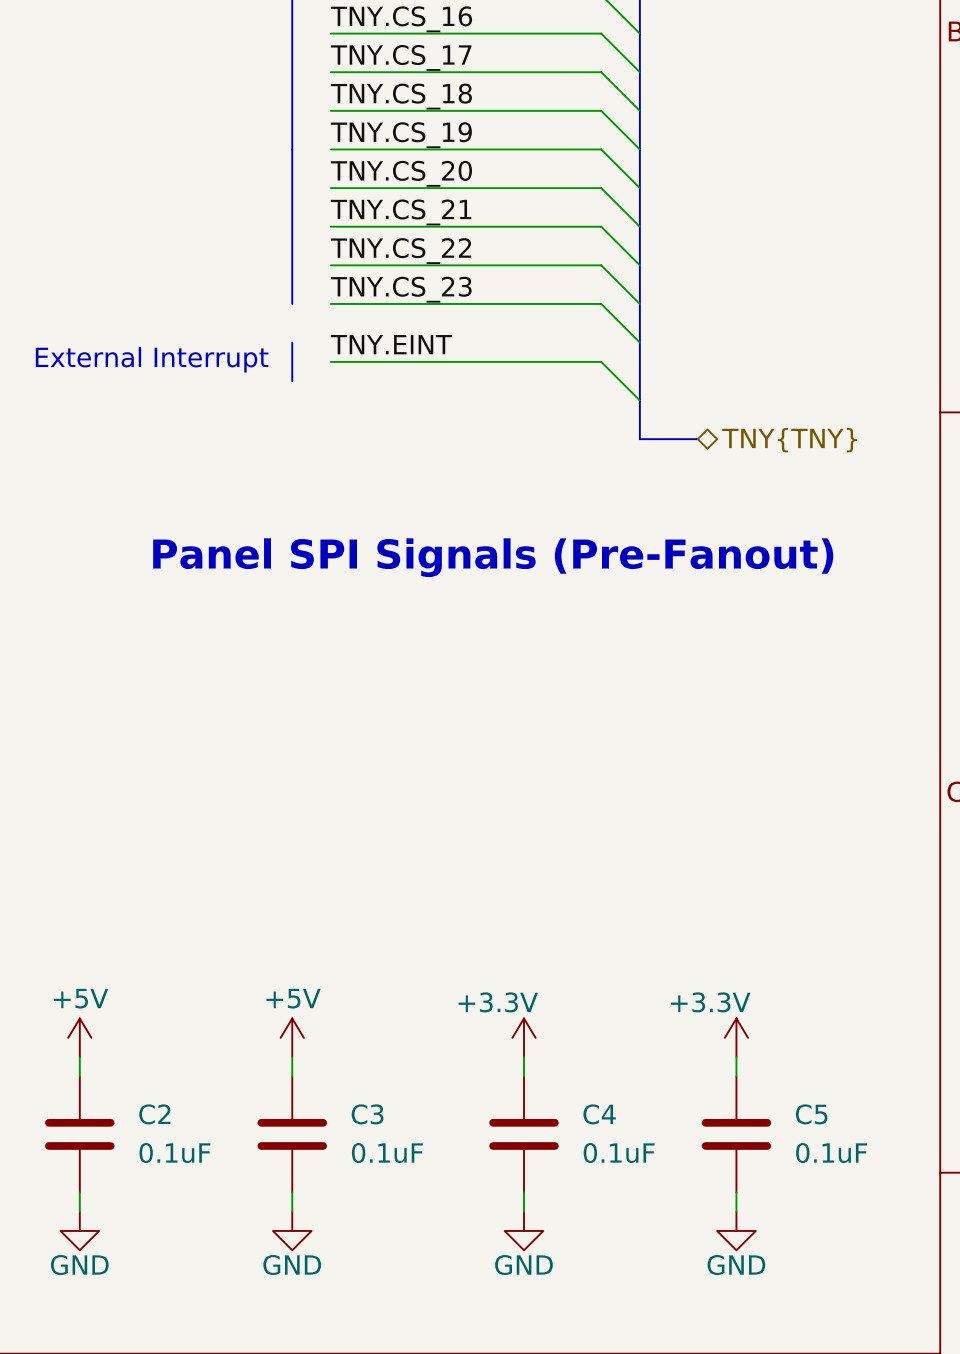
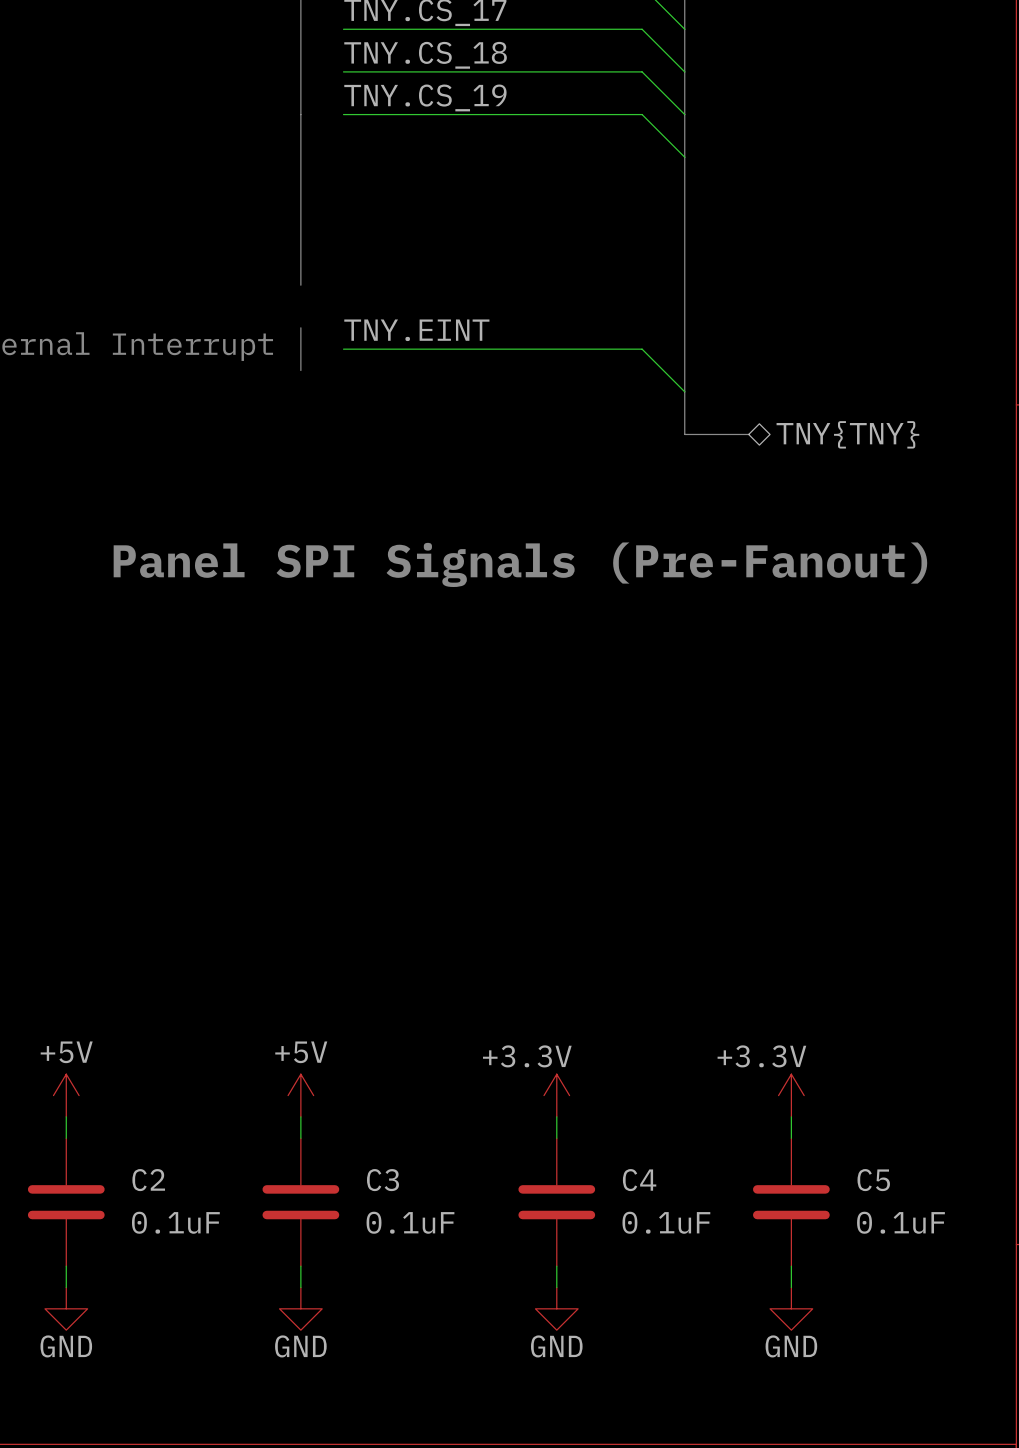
label: TNY.CS_20 (401, 173) -> none
wire: (330, 188) (601, 188) (639, 226) -> none
label: TNY.CS_21 (401, 212) -> none
wire: (330, 226) (601, 226) (639, 265) -> none
label: TNY.CS_22 (400, 251) -> none
wire: (330, 265) (601, 265) (639, 303) -> none
label: TNY.CS_23 (401, 289) -> none
wire: (330, 303) (601, 303) (639, 342) -> none

